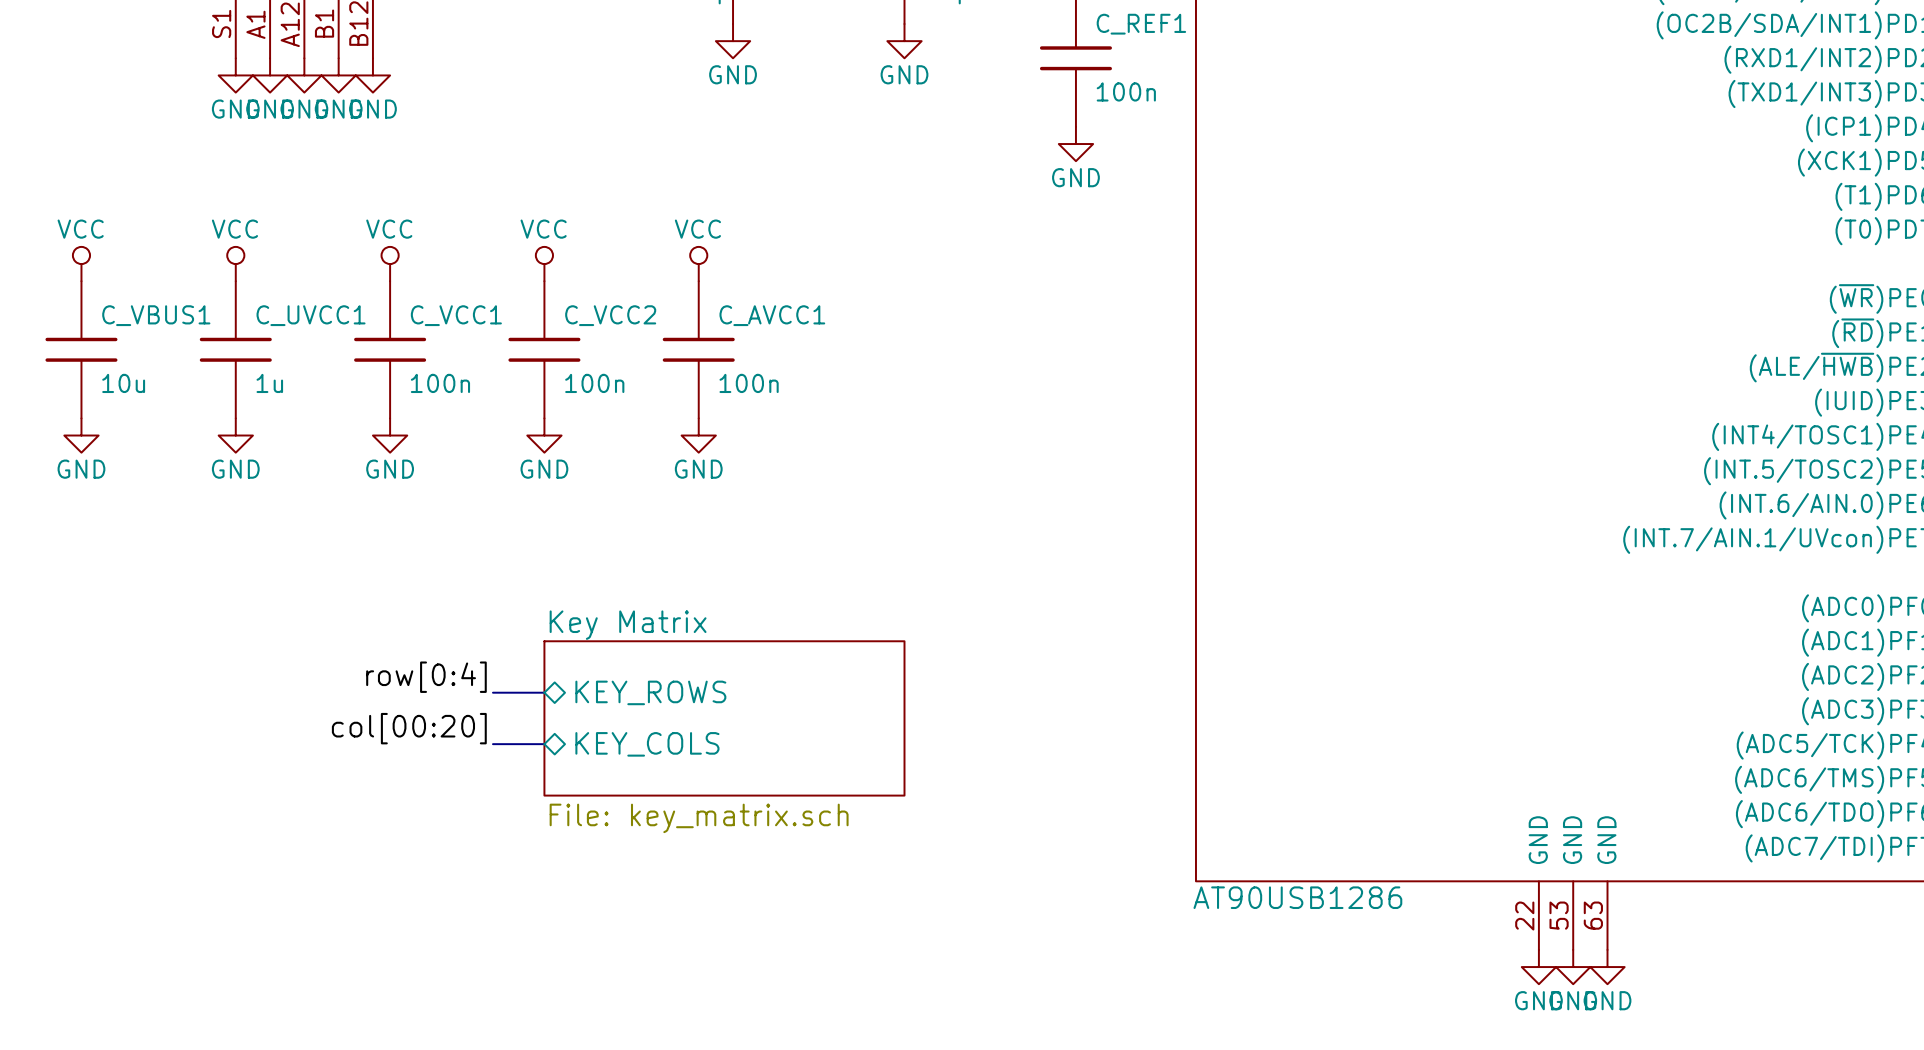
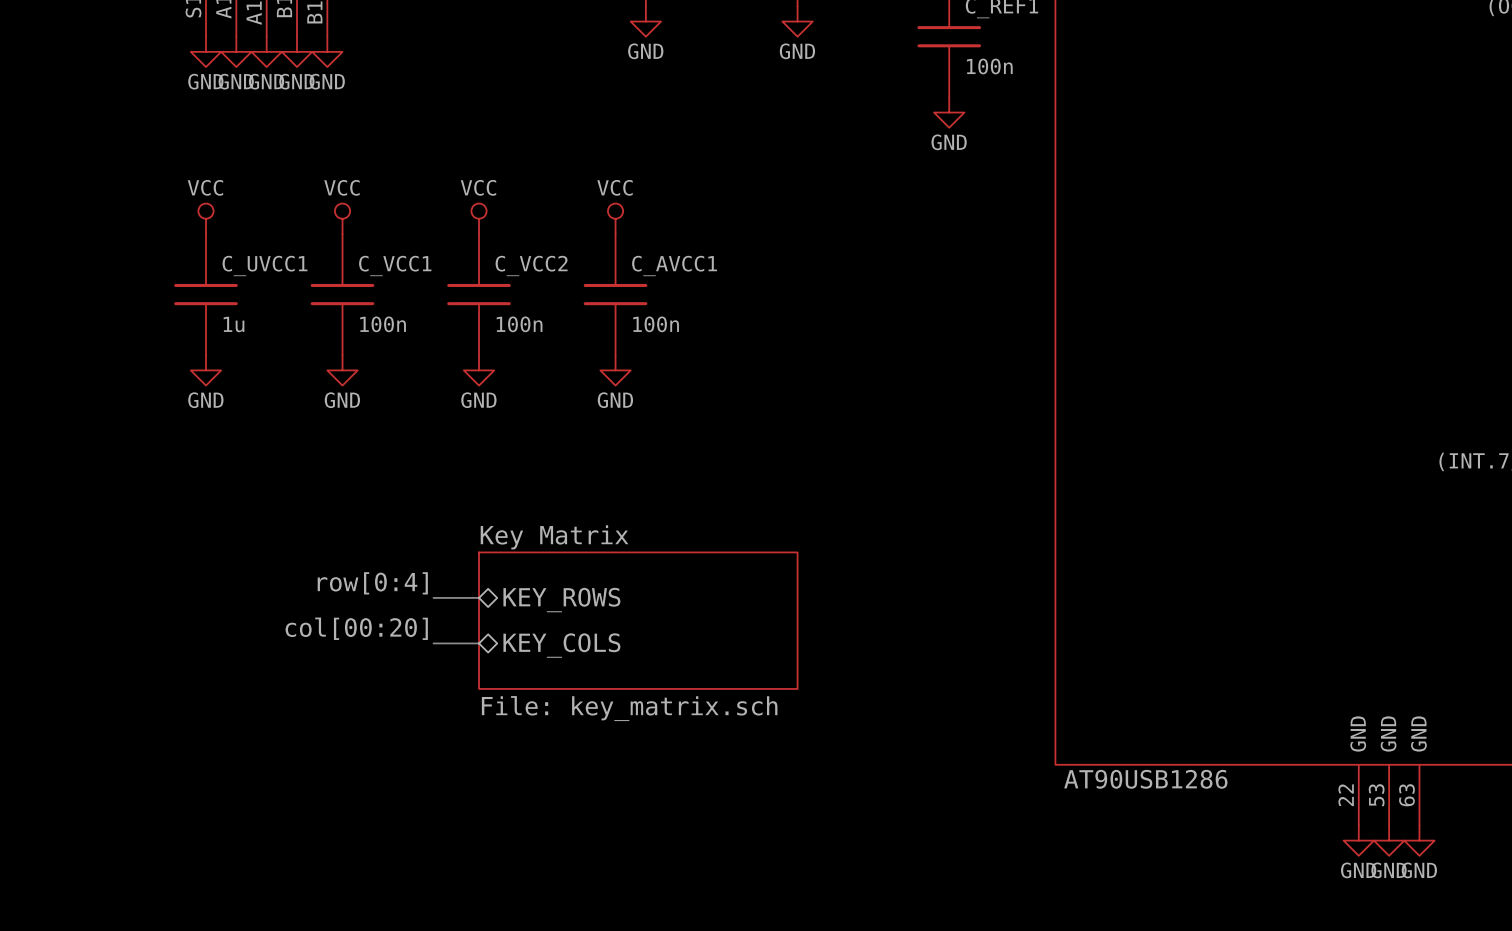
power symbol: VCC (81, 264) -> none
C_VBUS1: 10u (81, 349) -> none
power symbol: GND (81, 435) -> none

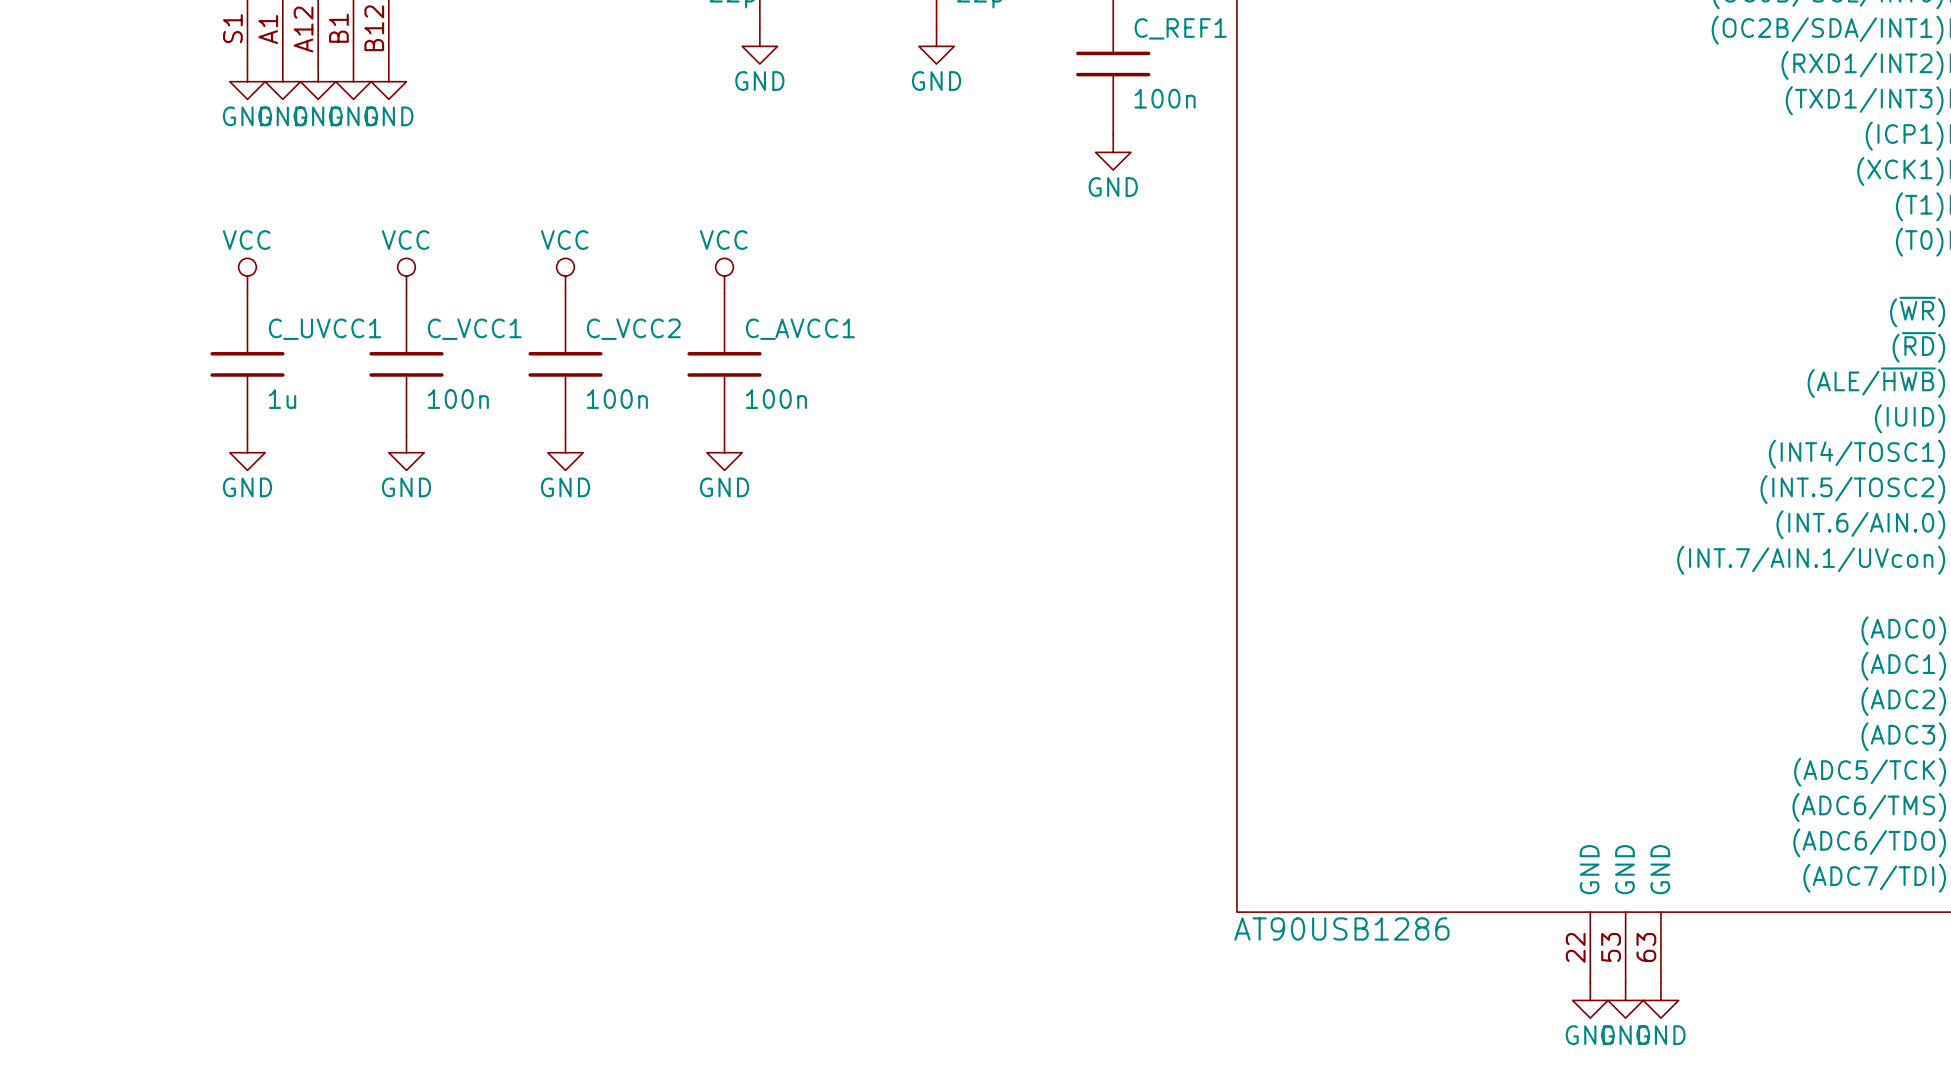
label: row[0:4] (372, 583) -> none
bus: (433, 597) (479, 597) -> none
sheet pin: KEY_ROWS (561, 600) -> none
sheet Key Matrix: File: key_matrix.sch (638, 620) -> none
label: col[00:20] (356, 628) -> none
bus: (433, 643) (479, 643) -> none
sheet pin: KEY_COLS (561, 645) -> none

